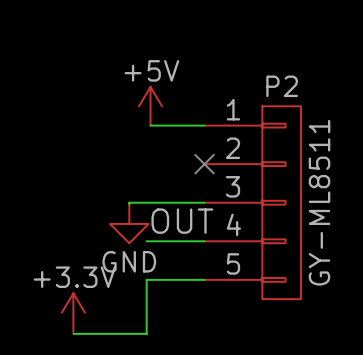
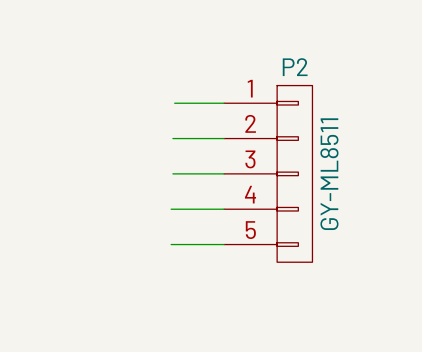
power symbol: +5V (150, 106) -> none
wire: none -> (172, 138) (224, 138)
no-connect mark: (204, 164) -> none
wire: (148, 202) (129, 202) (129, 204) -> none
label: OUT (182, 221) -> none
power symbol: GND (129, 223) -> none
wire: (146, 279) (146, 333) (73, 333) -> none
power symbol: +3.3V (73, 312) -> none

